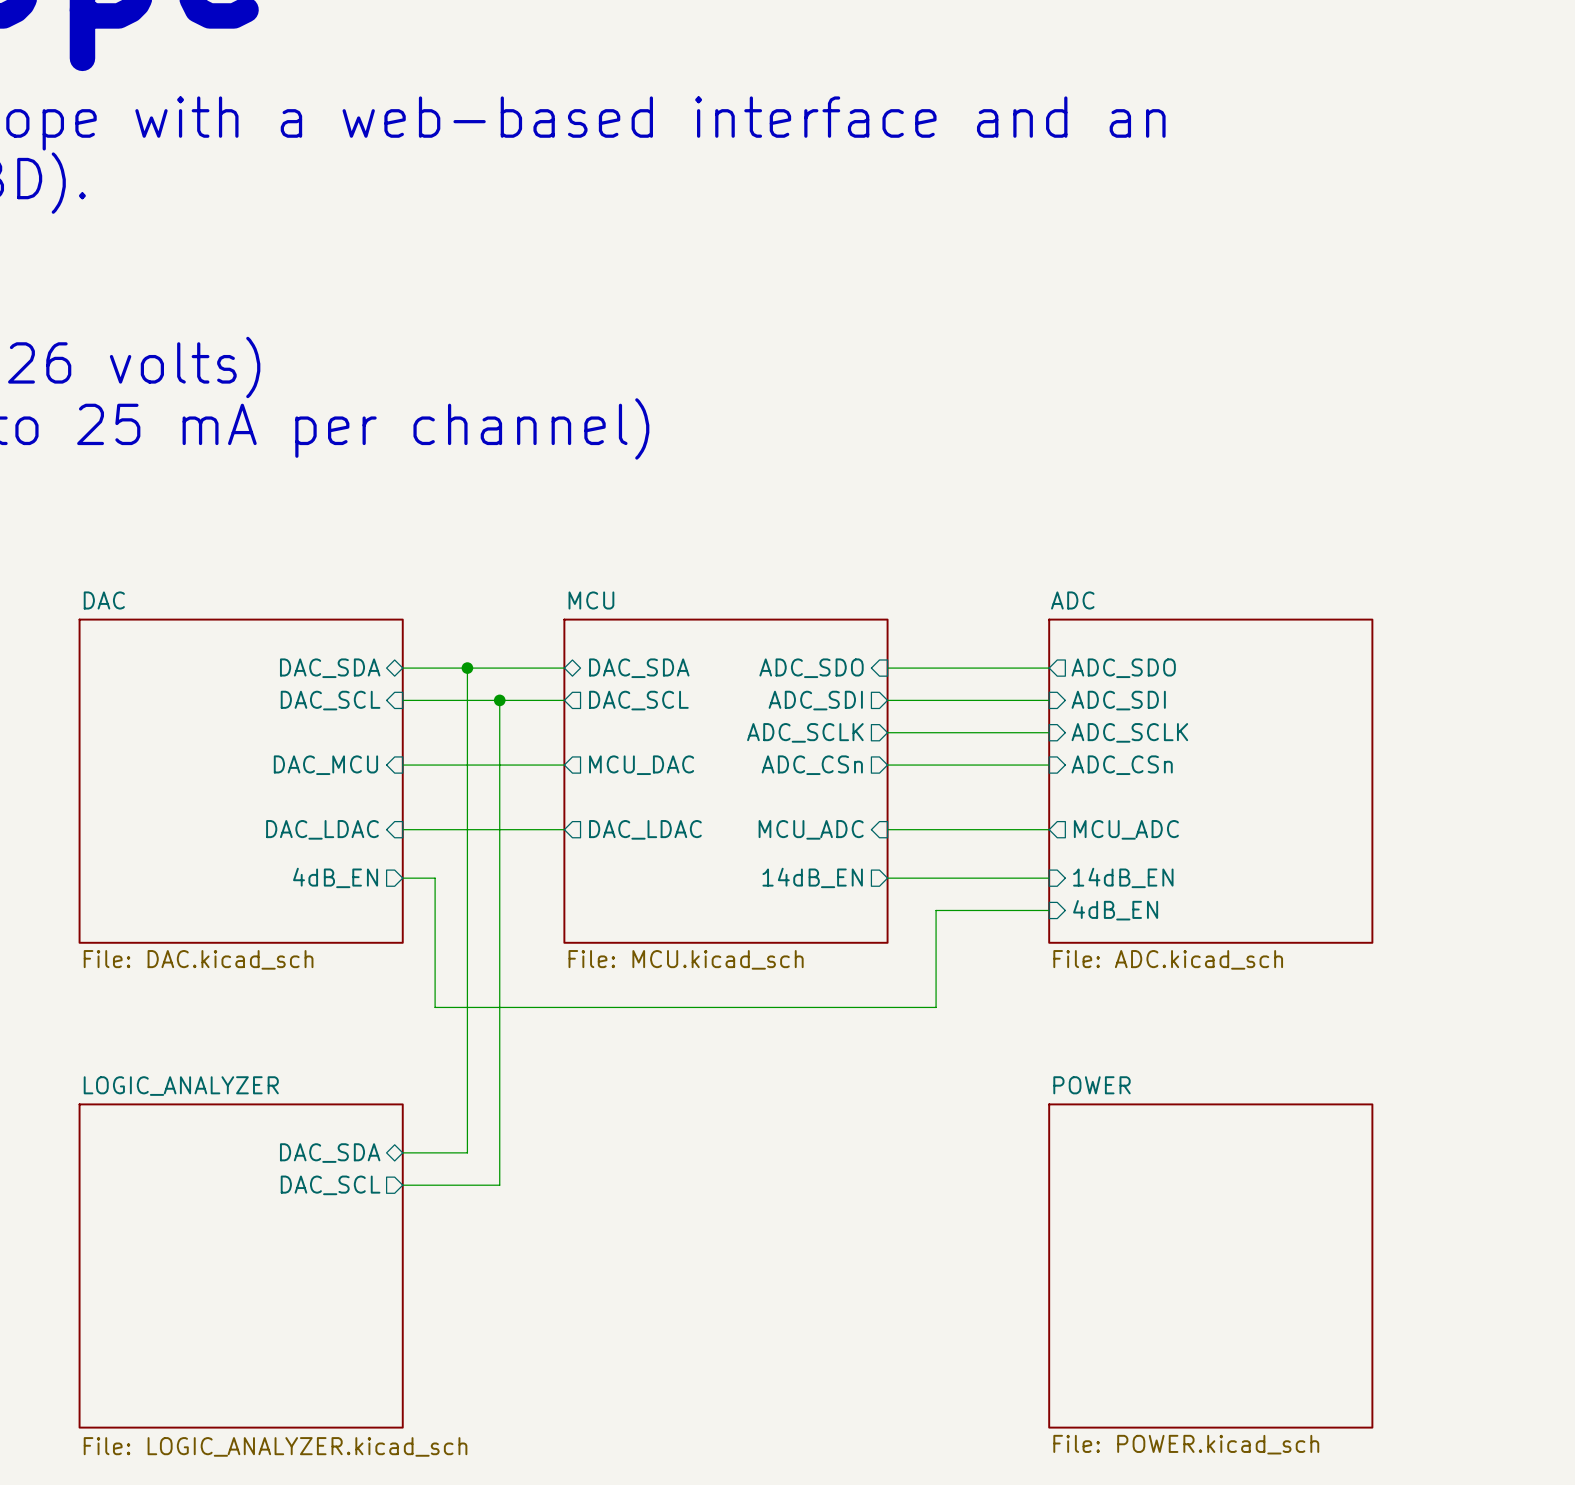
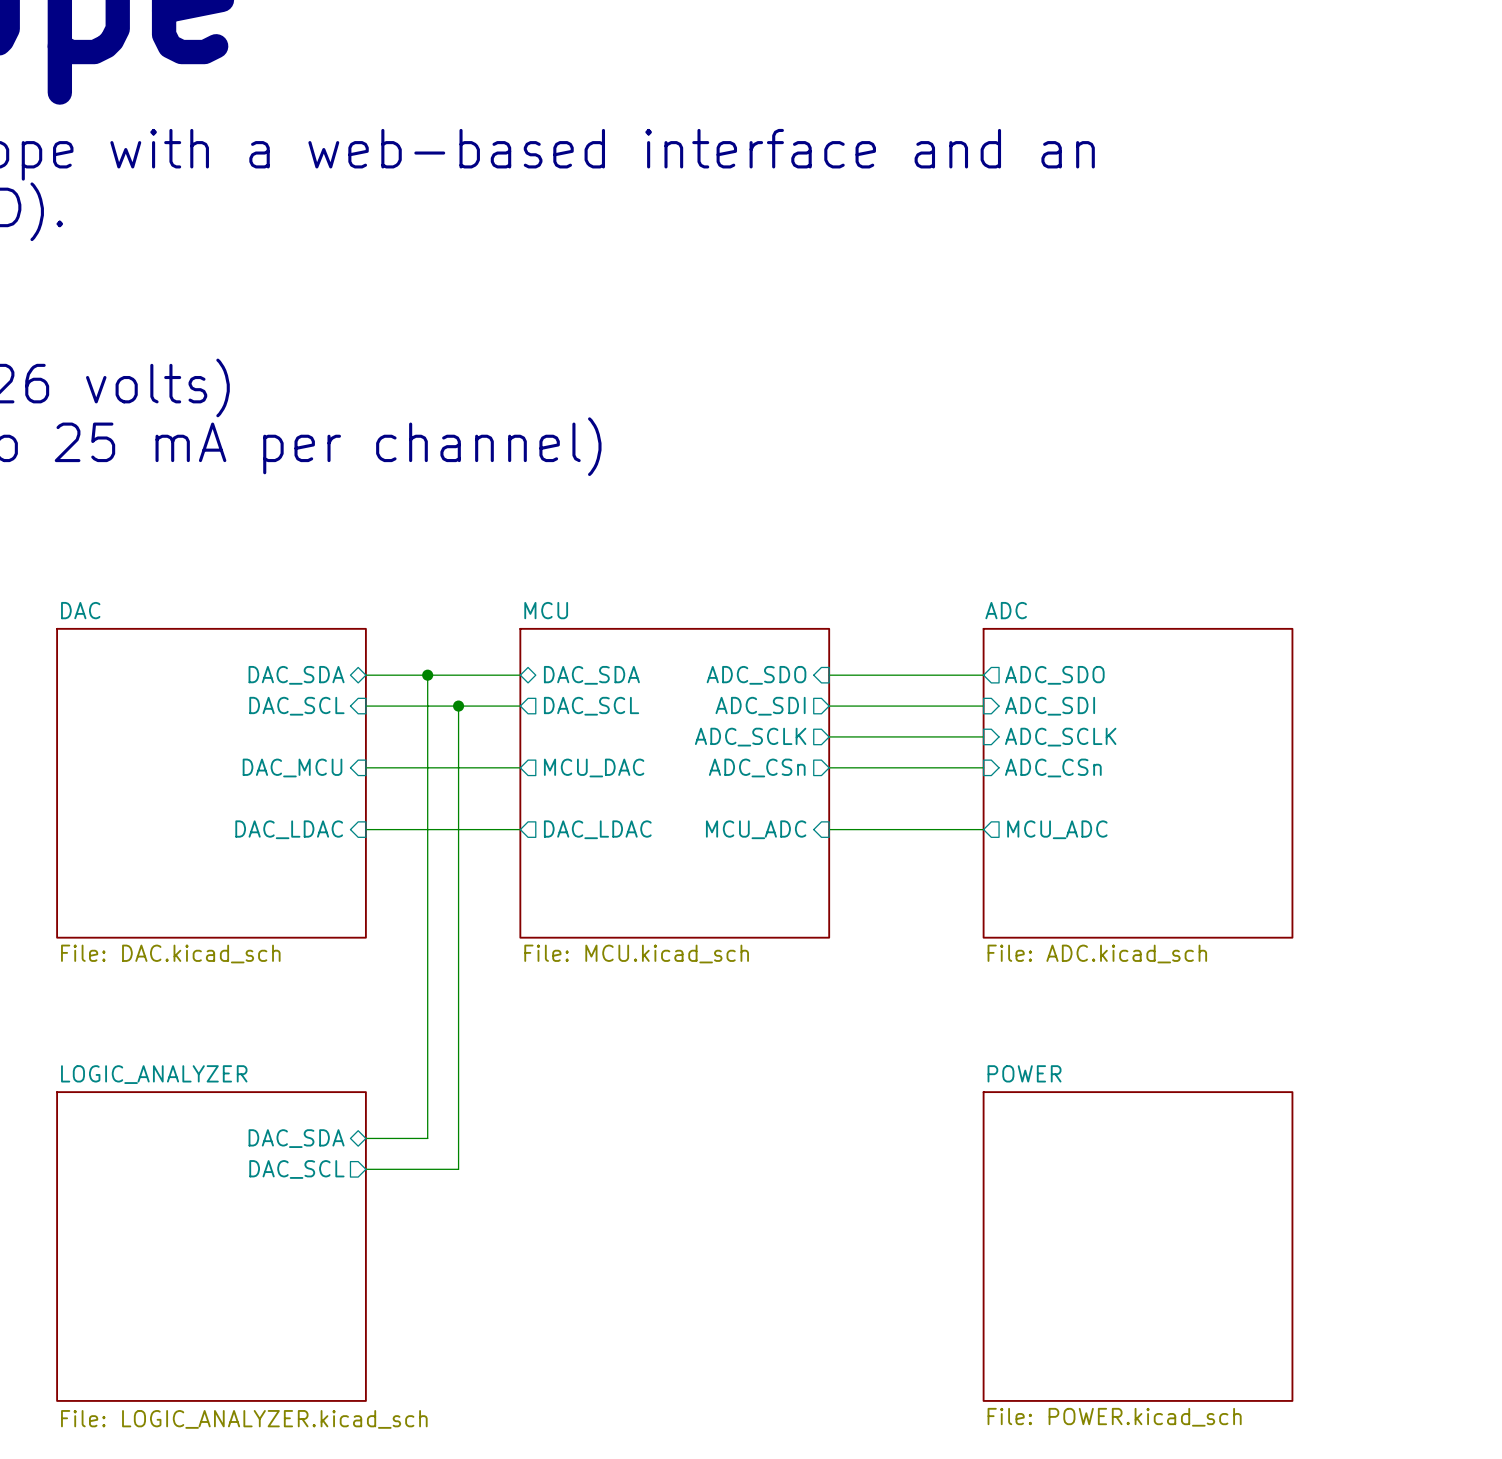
sheet pin: 4dB_EN (335, 877) -> none
sheet pin: 14dB_EN (812, 877) -> none
sheet pin: 14dB_EN (1123, 877) -> none
wire: (402, 878) (435, 878) (435, 1007) (936, 1007) (936, 910) (1049, 910) -> none
wire: (887, 878) (1049, 878) -> none
sheet pin: 4dB_EN (1115, 910) -> none

